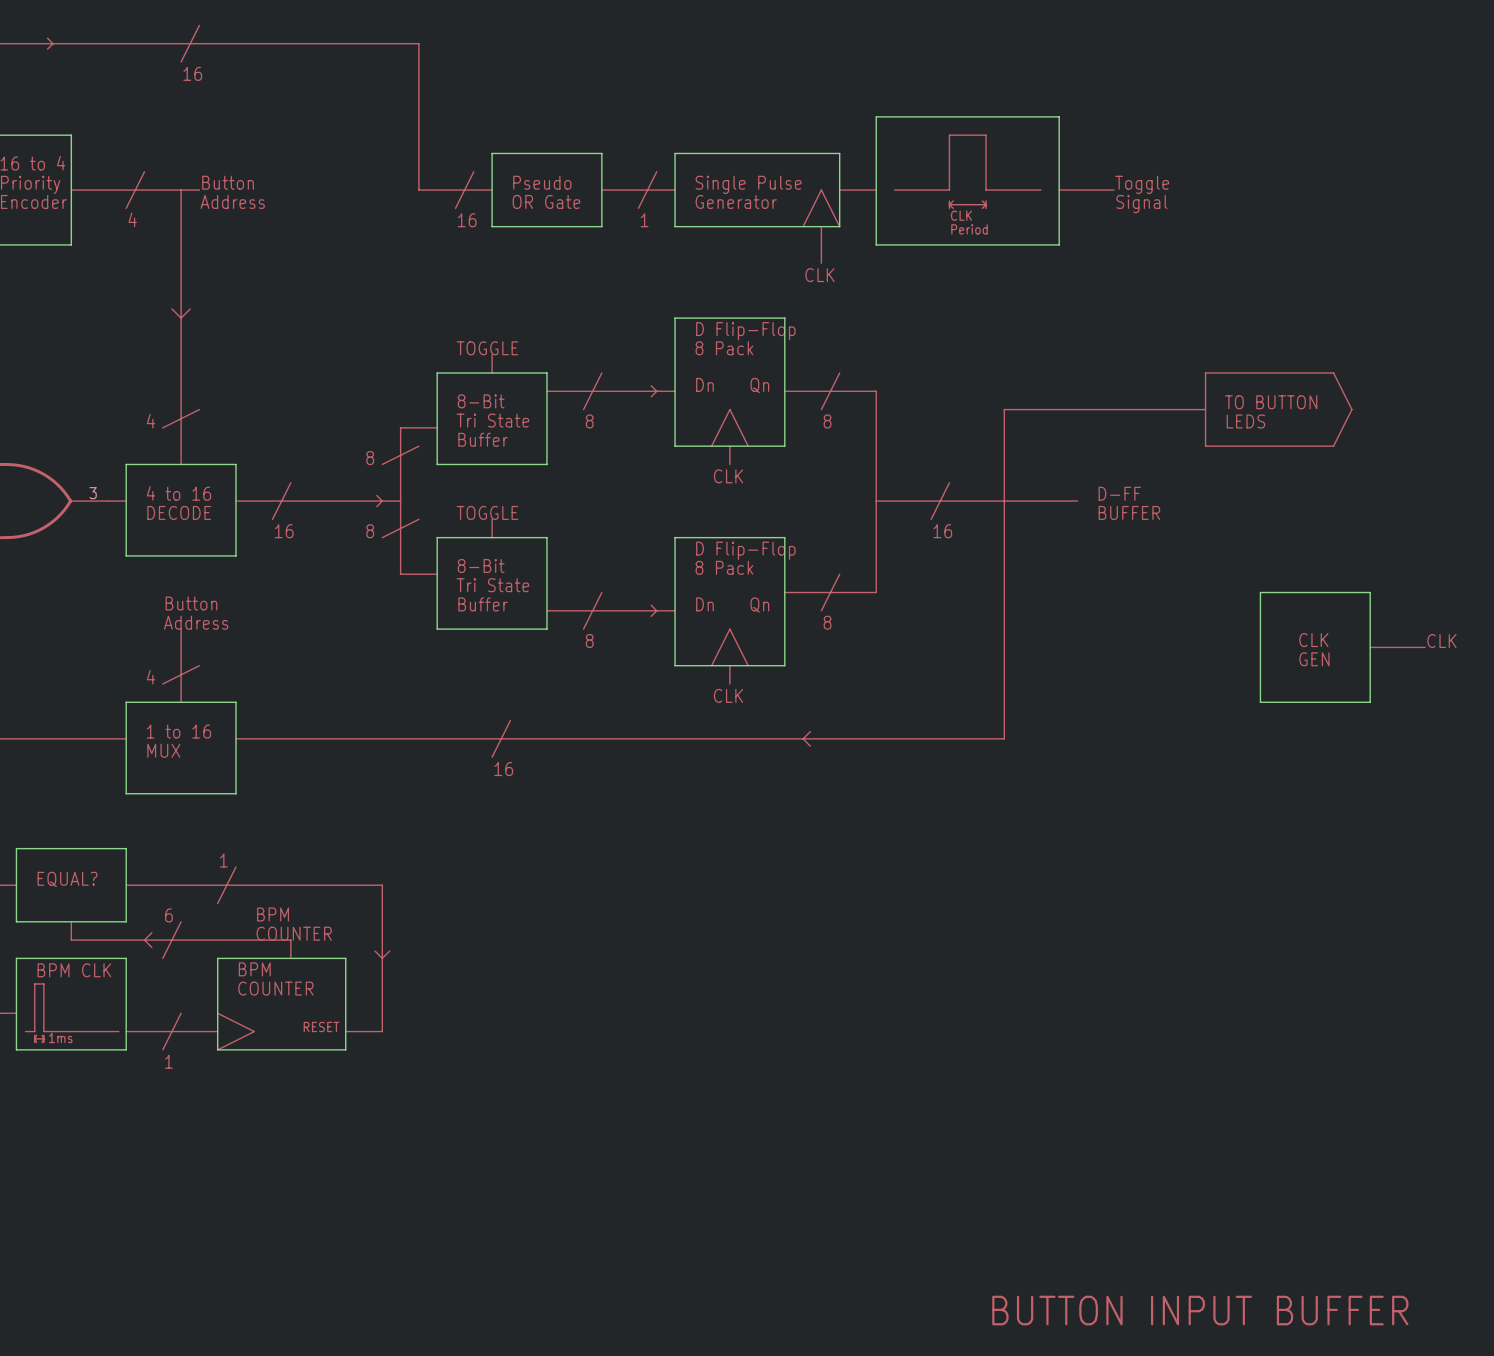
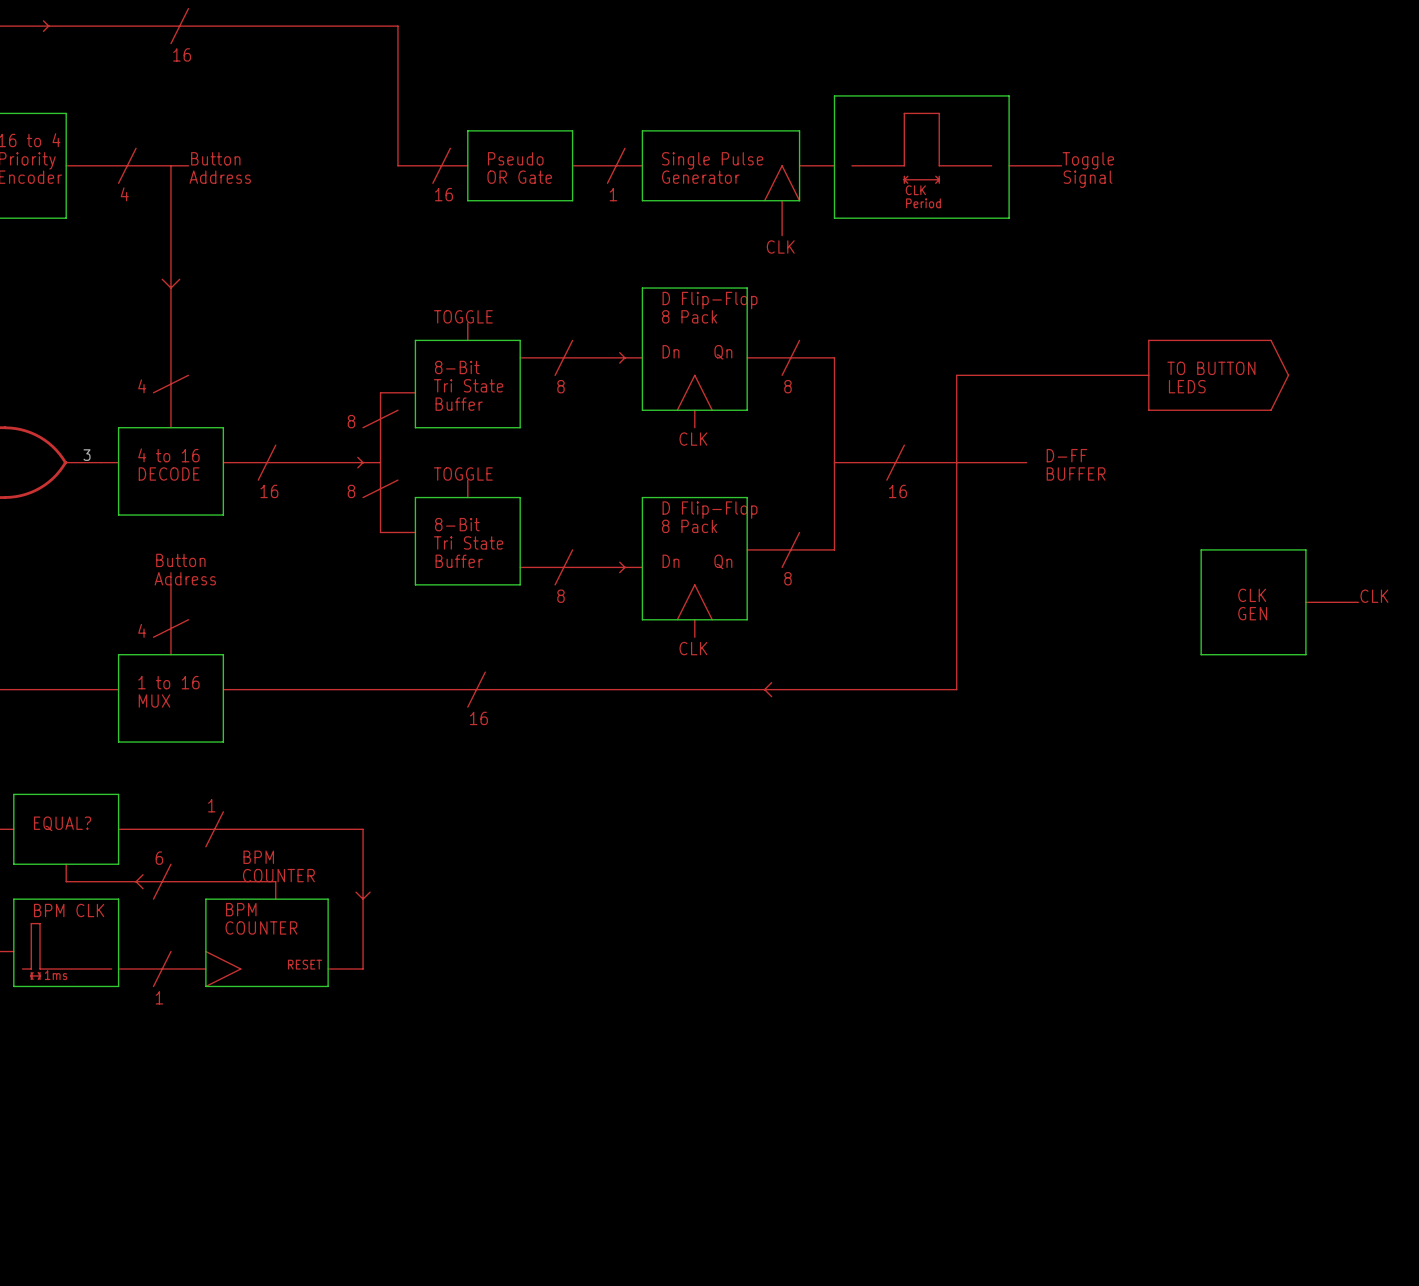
text: BUTTON INPUT BUFFER (1200, 1310) -> none

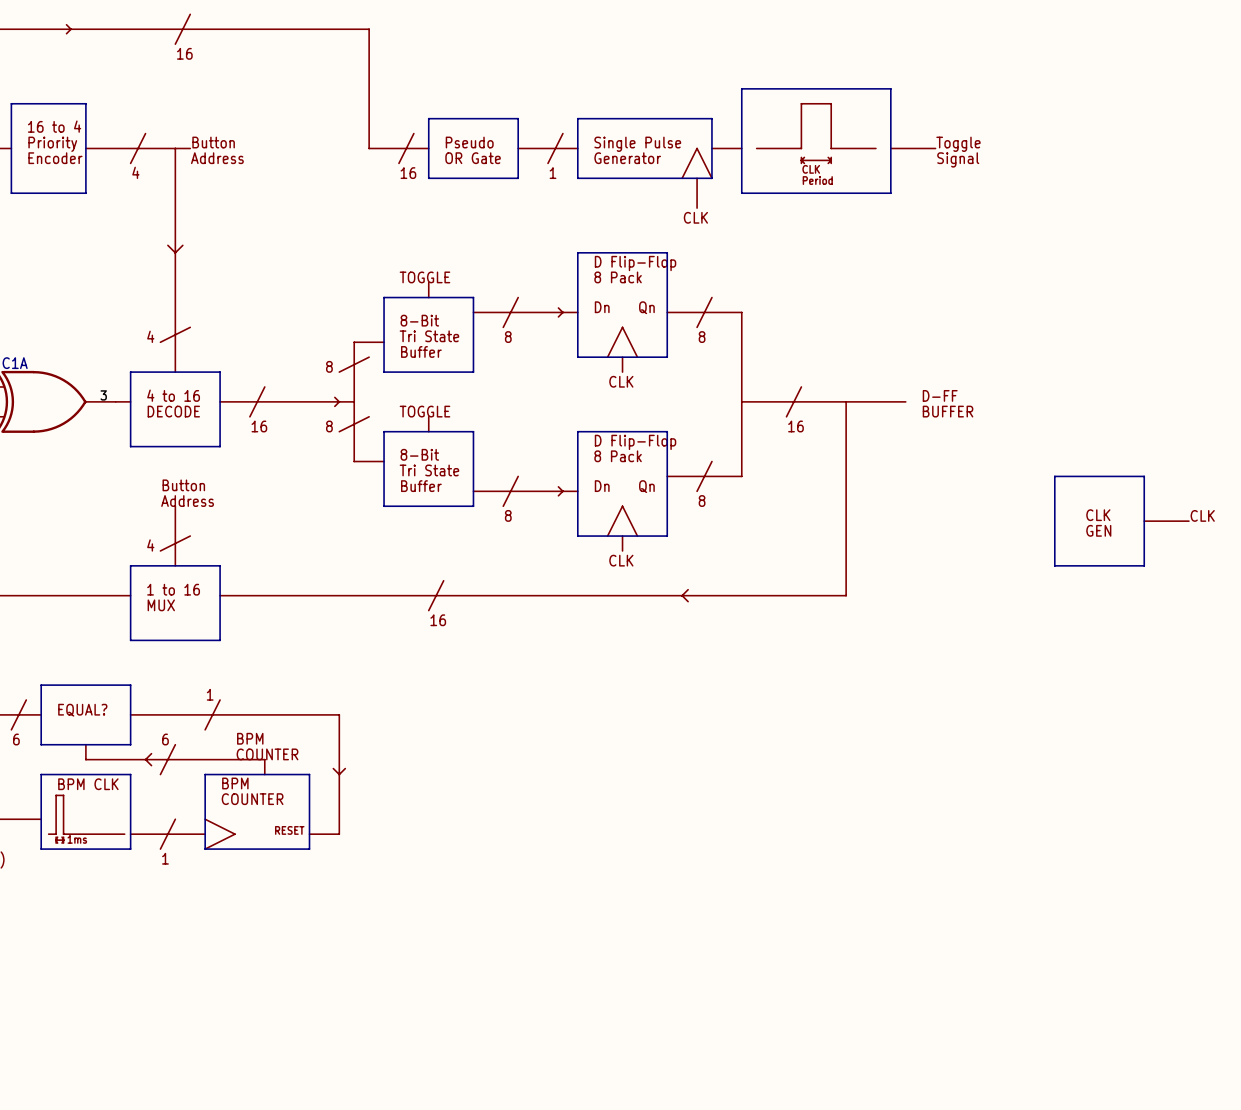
line: (1148, 340) (1148, 410) (1271, 410) (1288, 375) (1271, 340) (1148, 340) -> none
text: TO BUTTON (1211, 368) -> none
line: (1148, 375) (956, 375) (956, 462) -> none
text: LEDS (1187, 386) -> none

